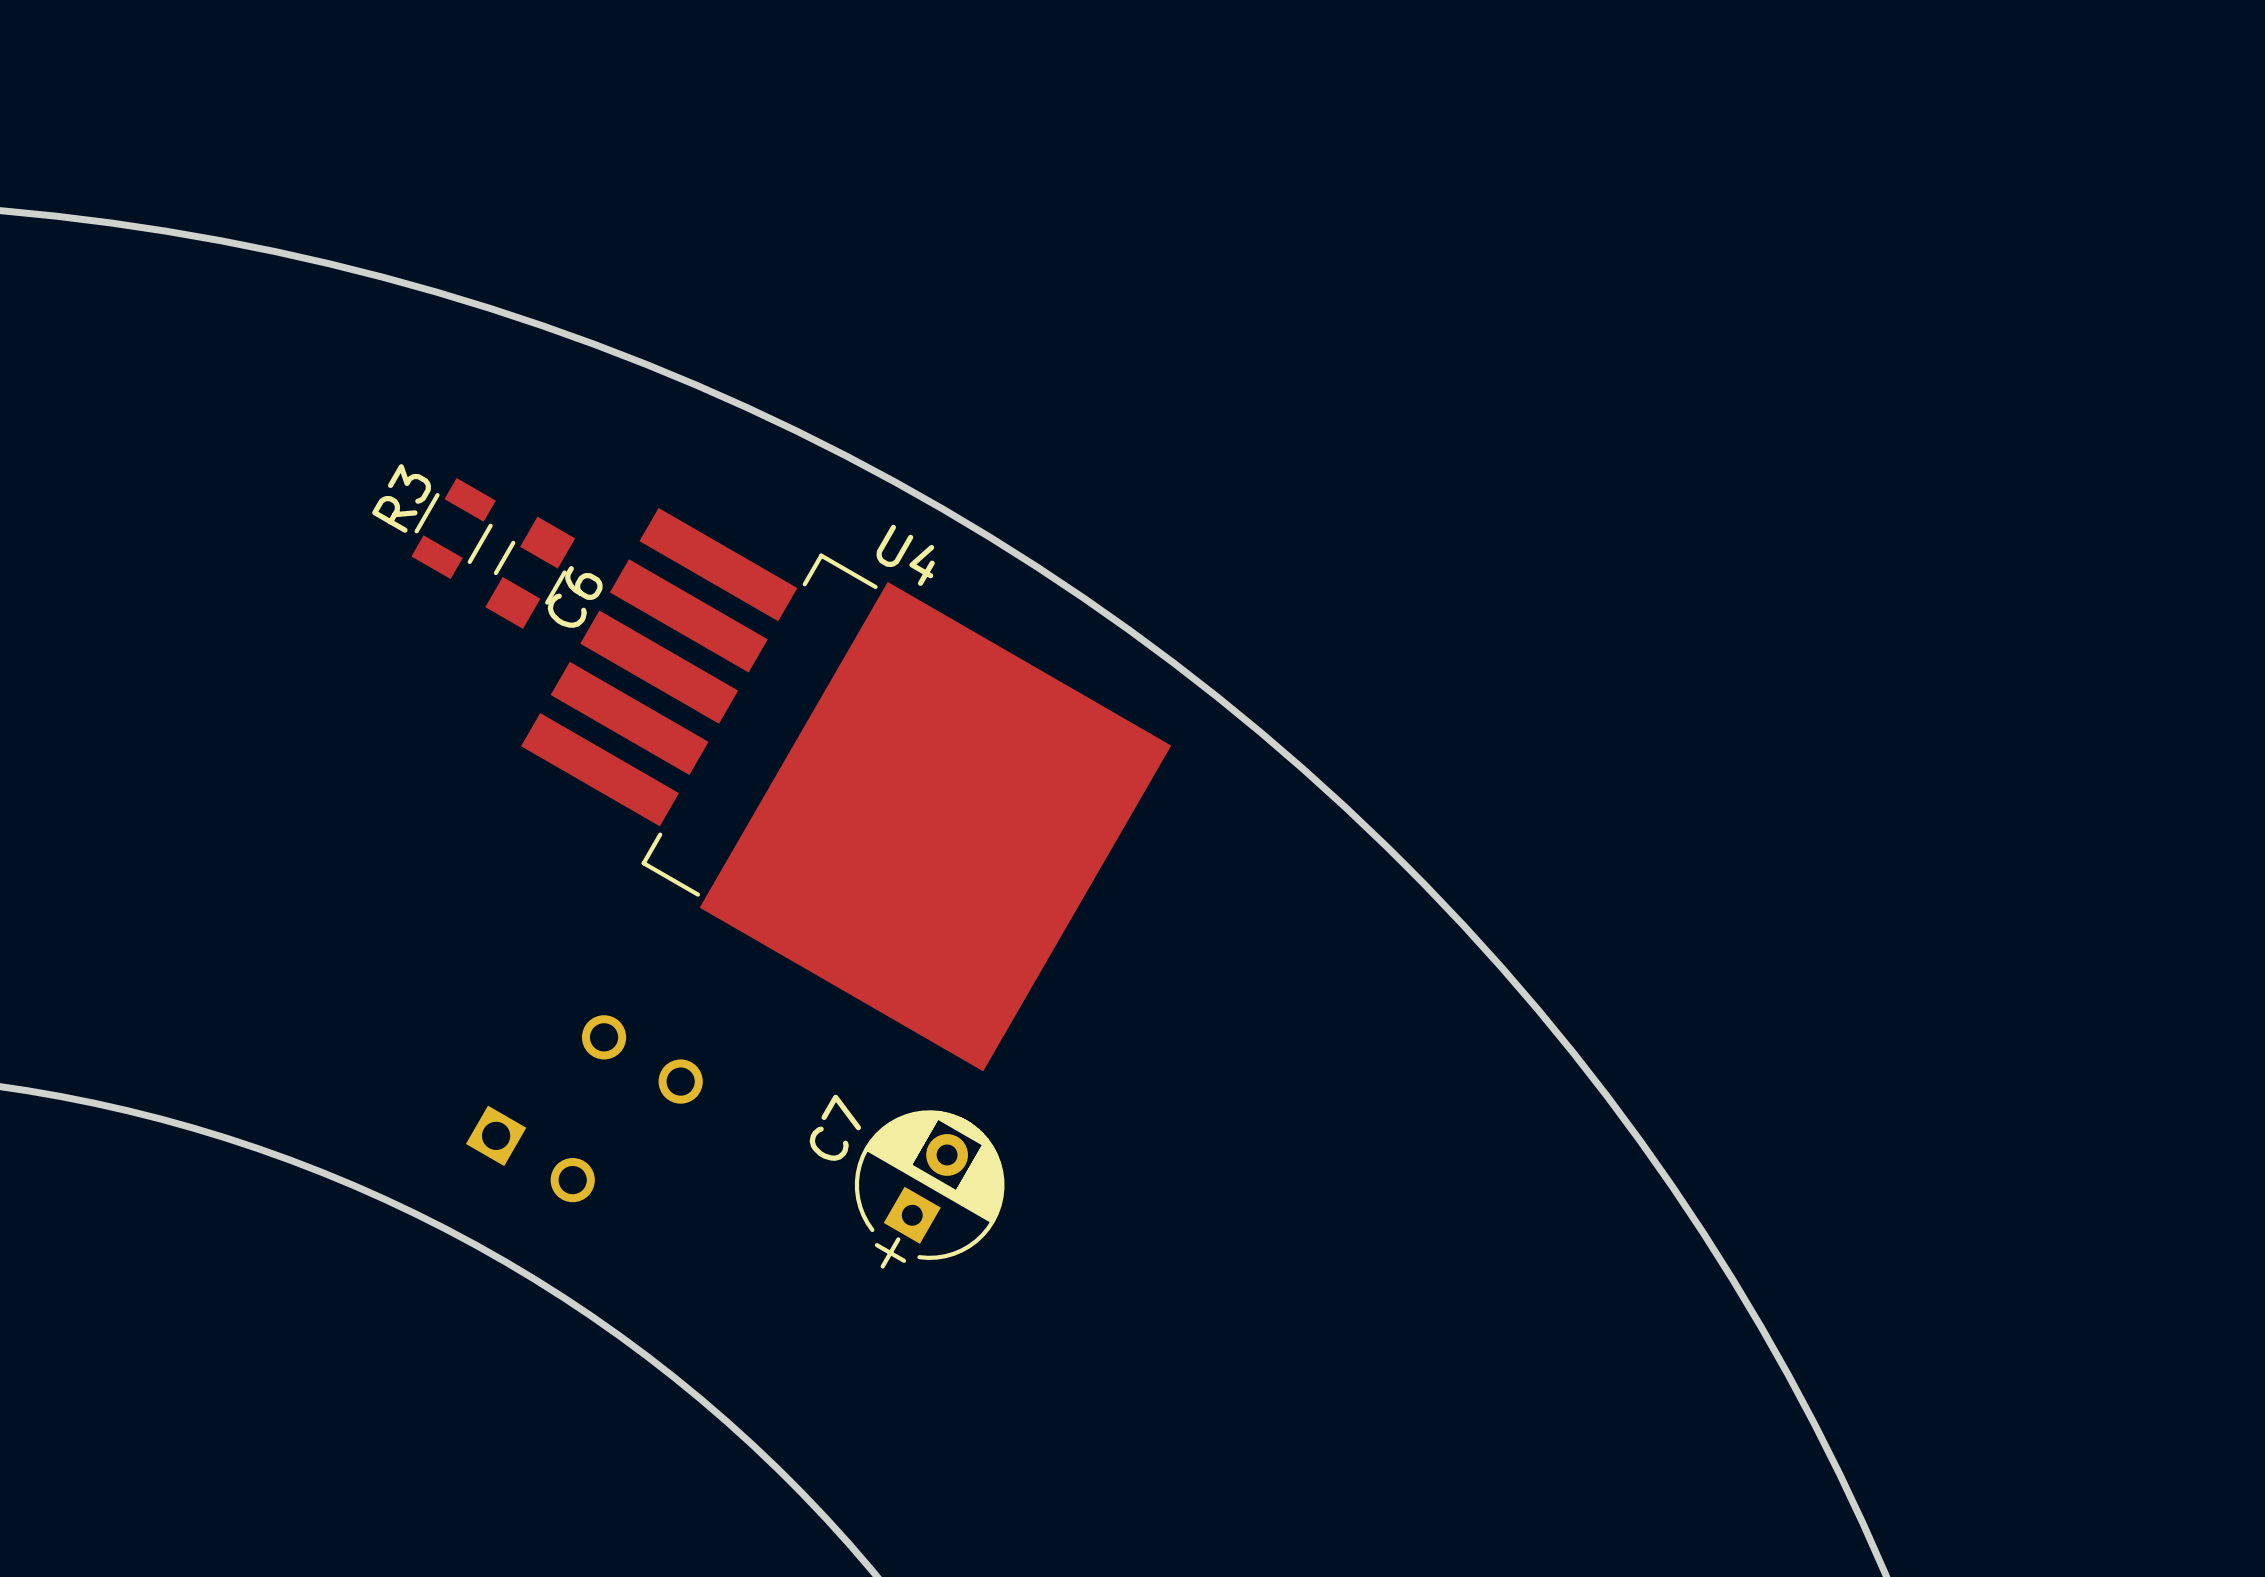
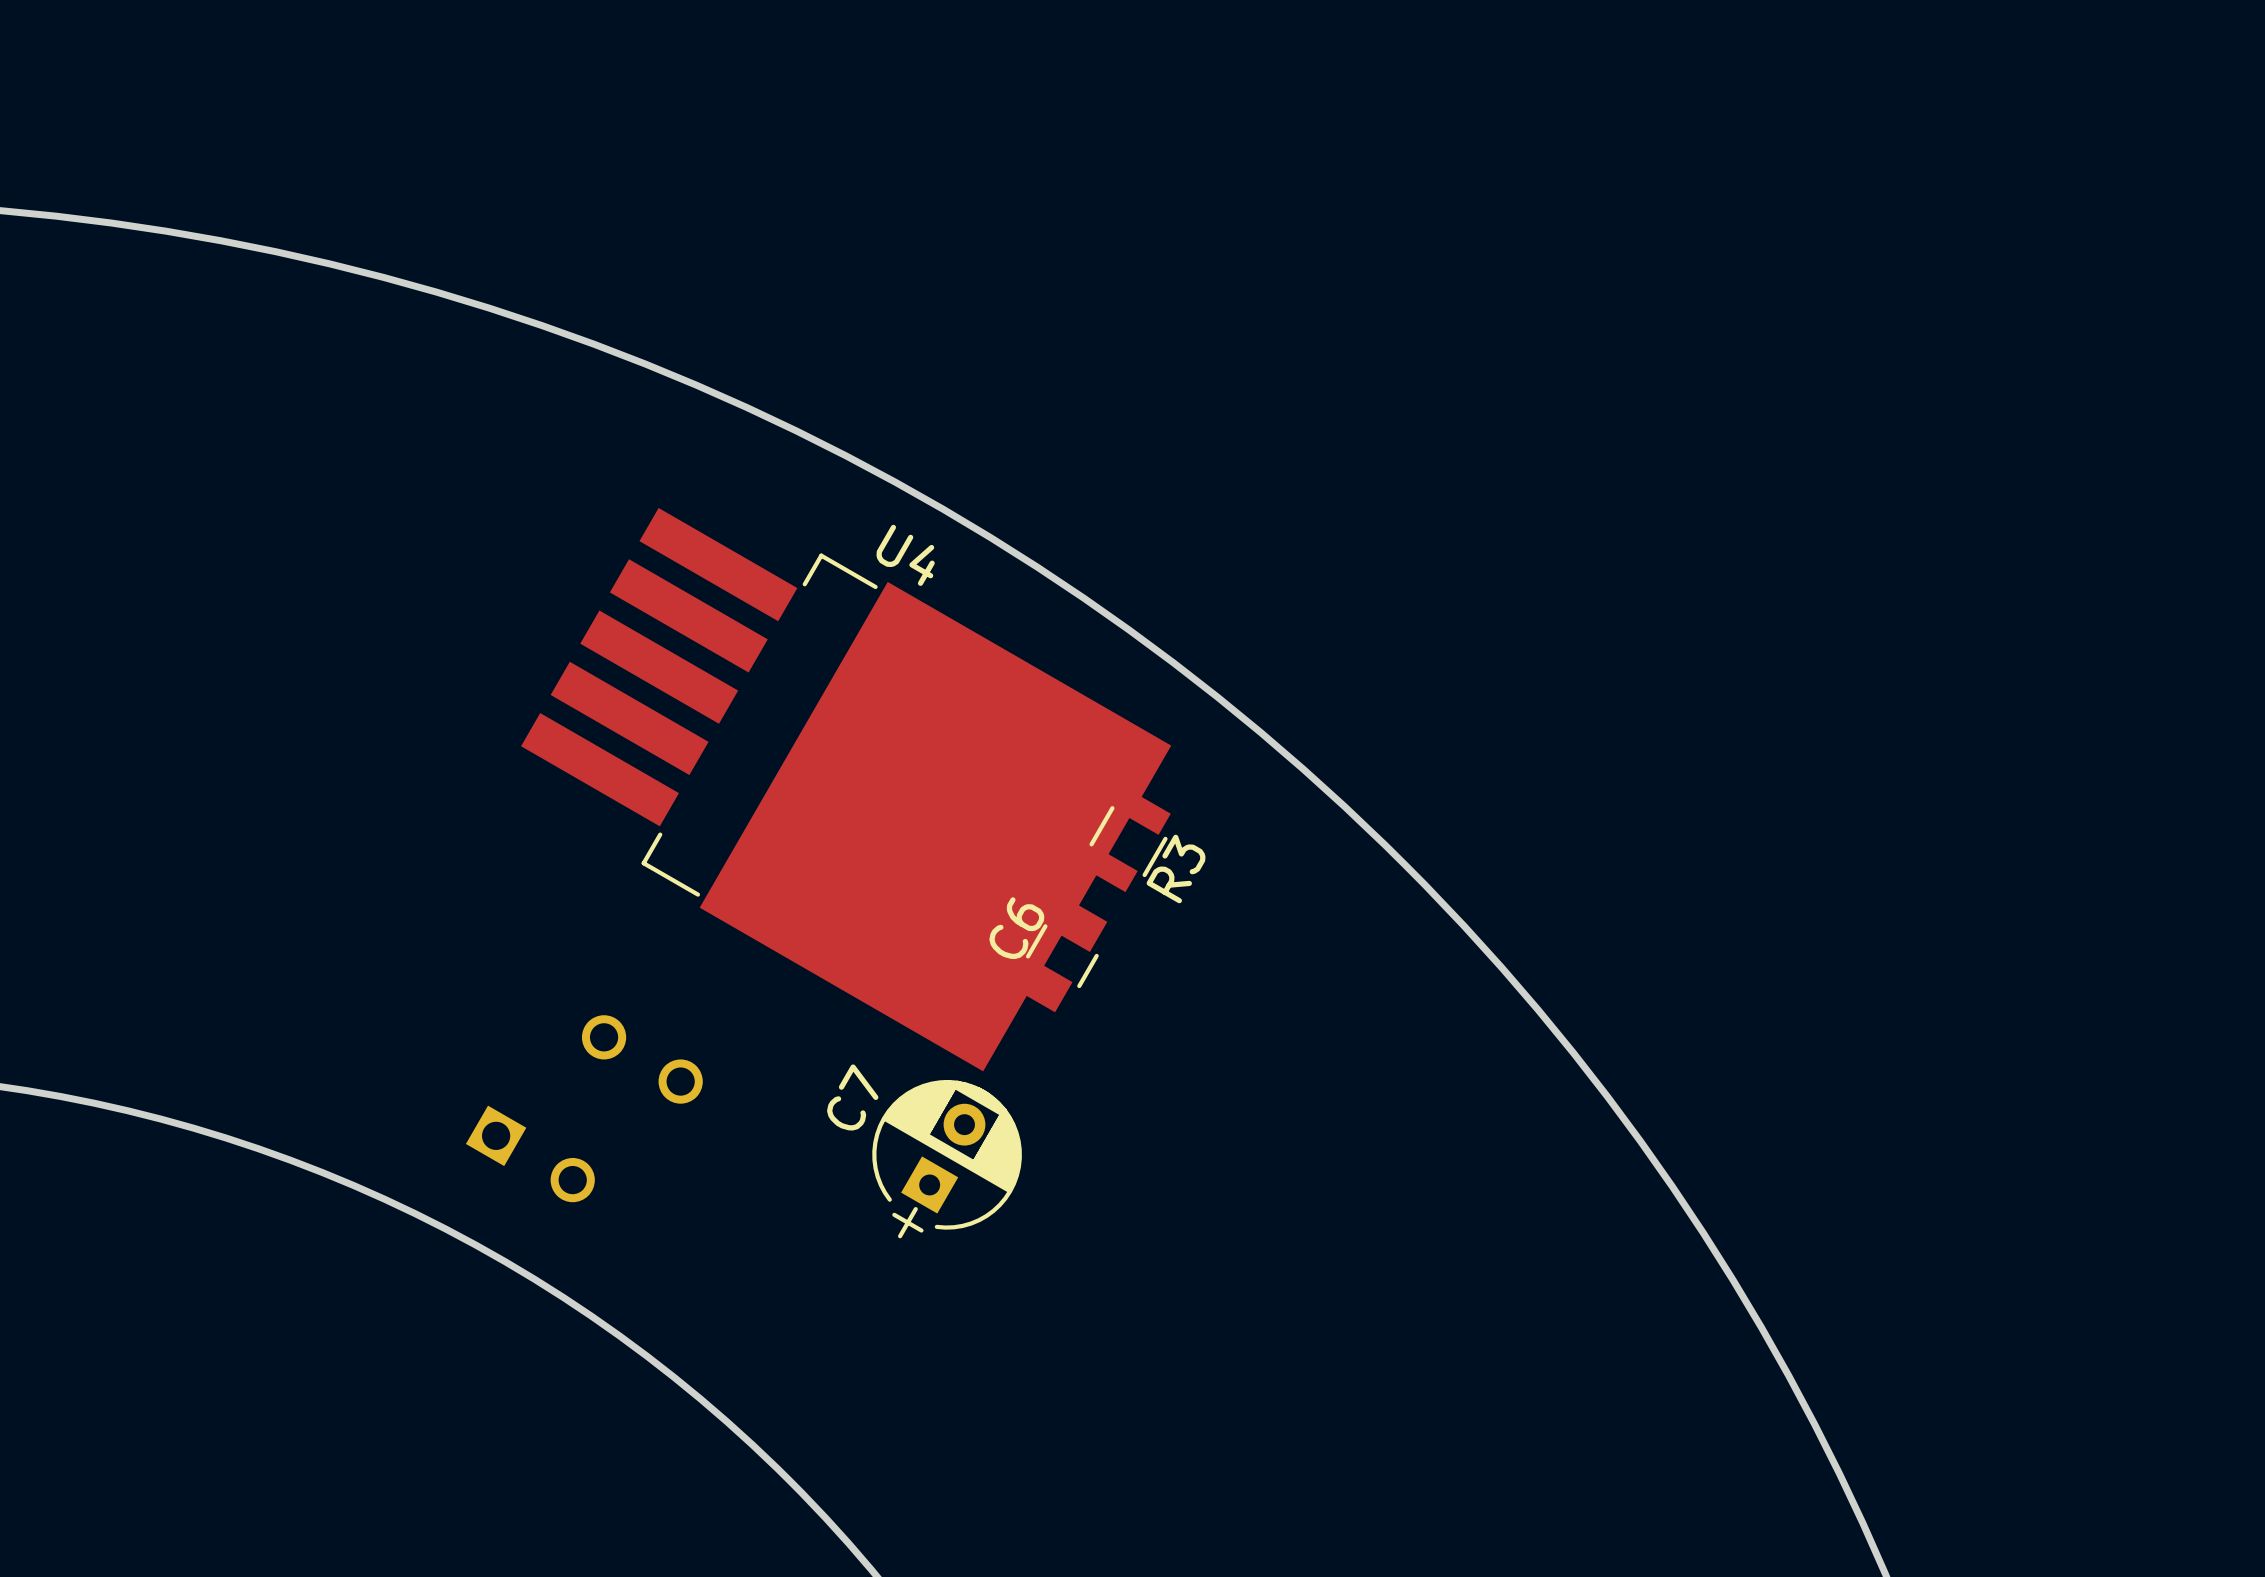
R3 name position: R3 (401, 498) -> R3 (1176, 868)
R3 position: (453, 528) -> (1128, 841)
C6 position: (530, 572) -> (1062, 956)
C6 name position: C6 (575, 596) -> C6 (1016, 928)
C7 position: (929, 1189) -> (947, 1159)

